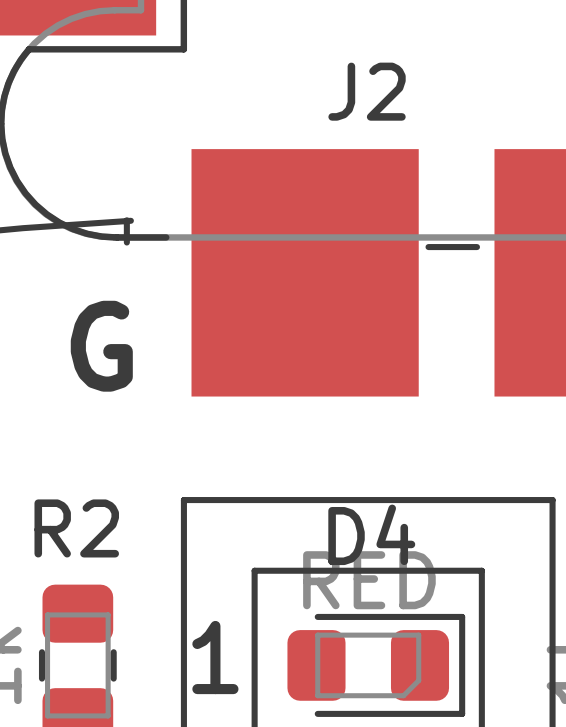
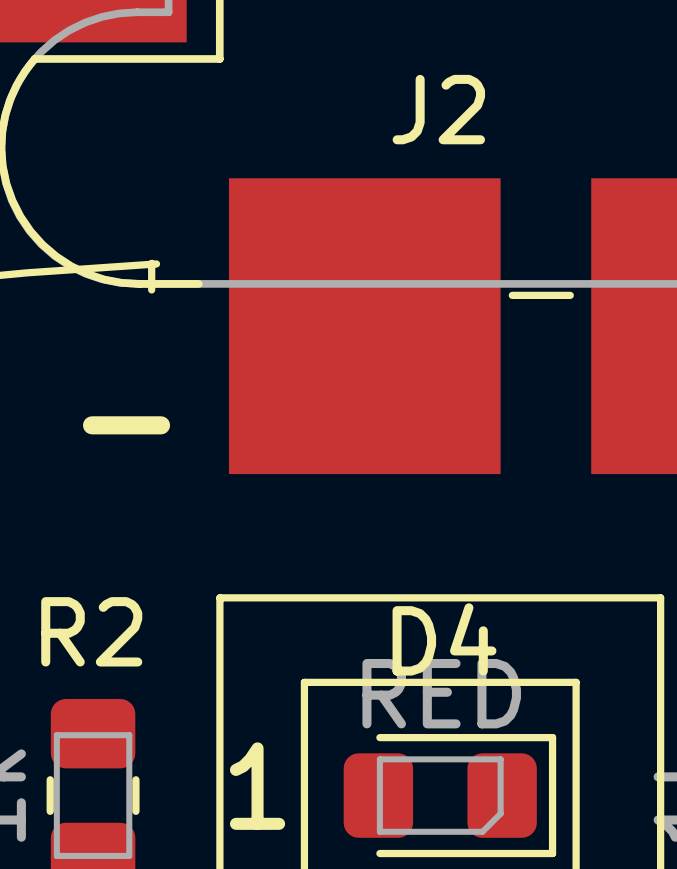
text: G (101, 346) -> - (126, 425)

